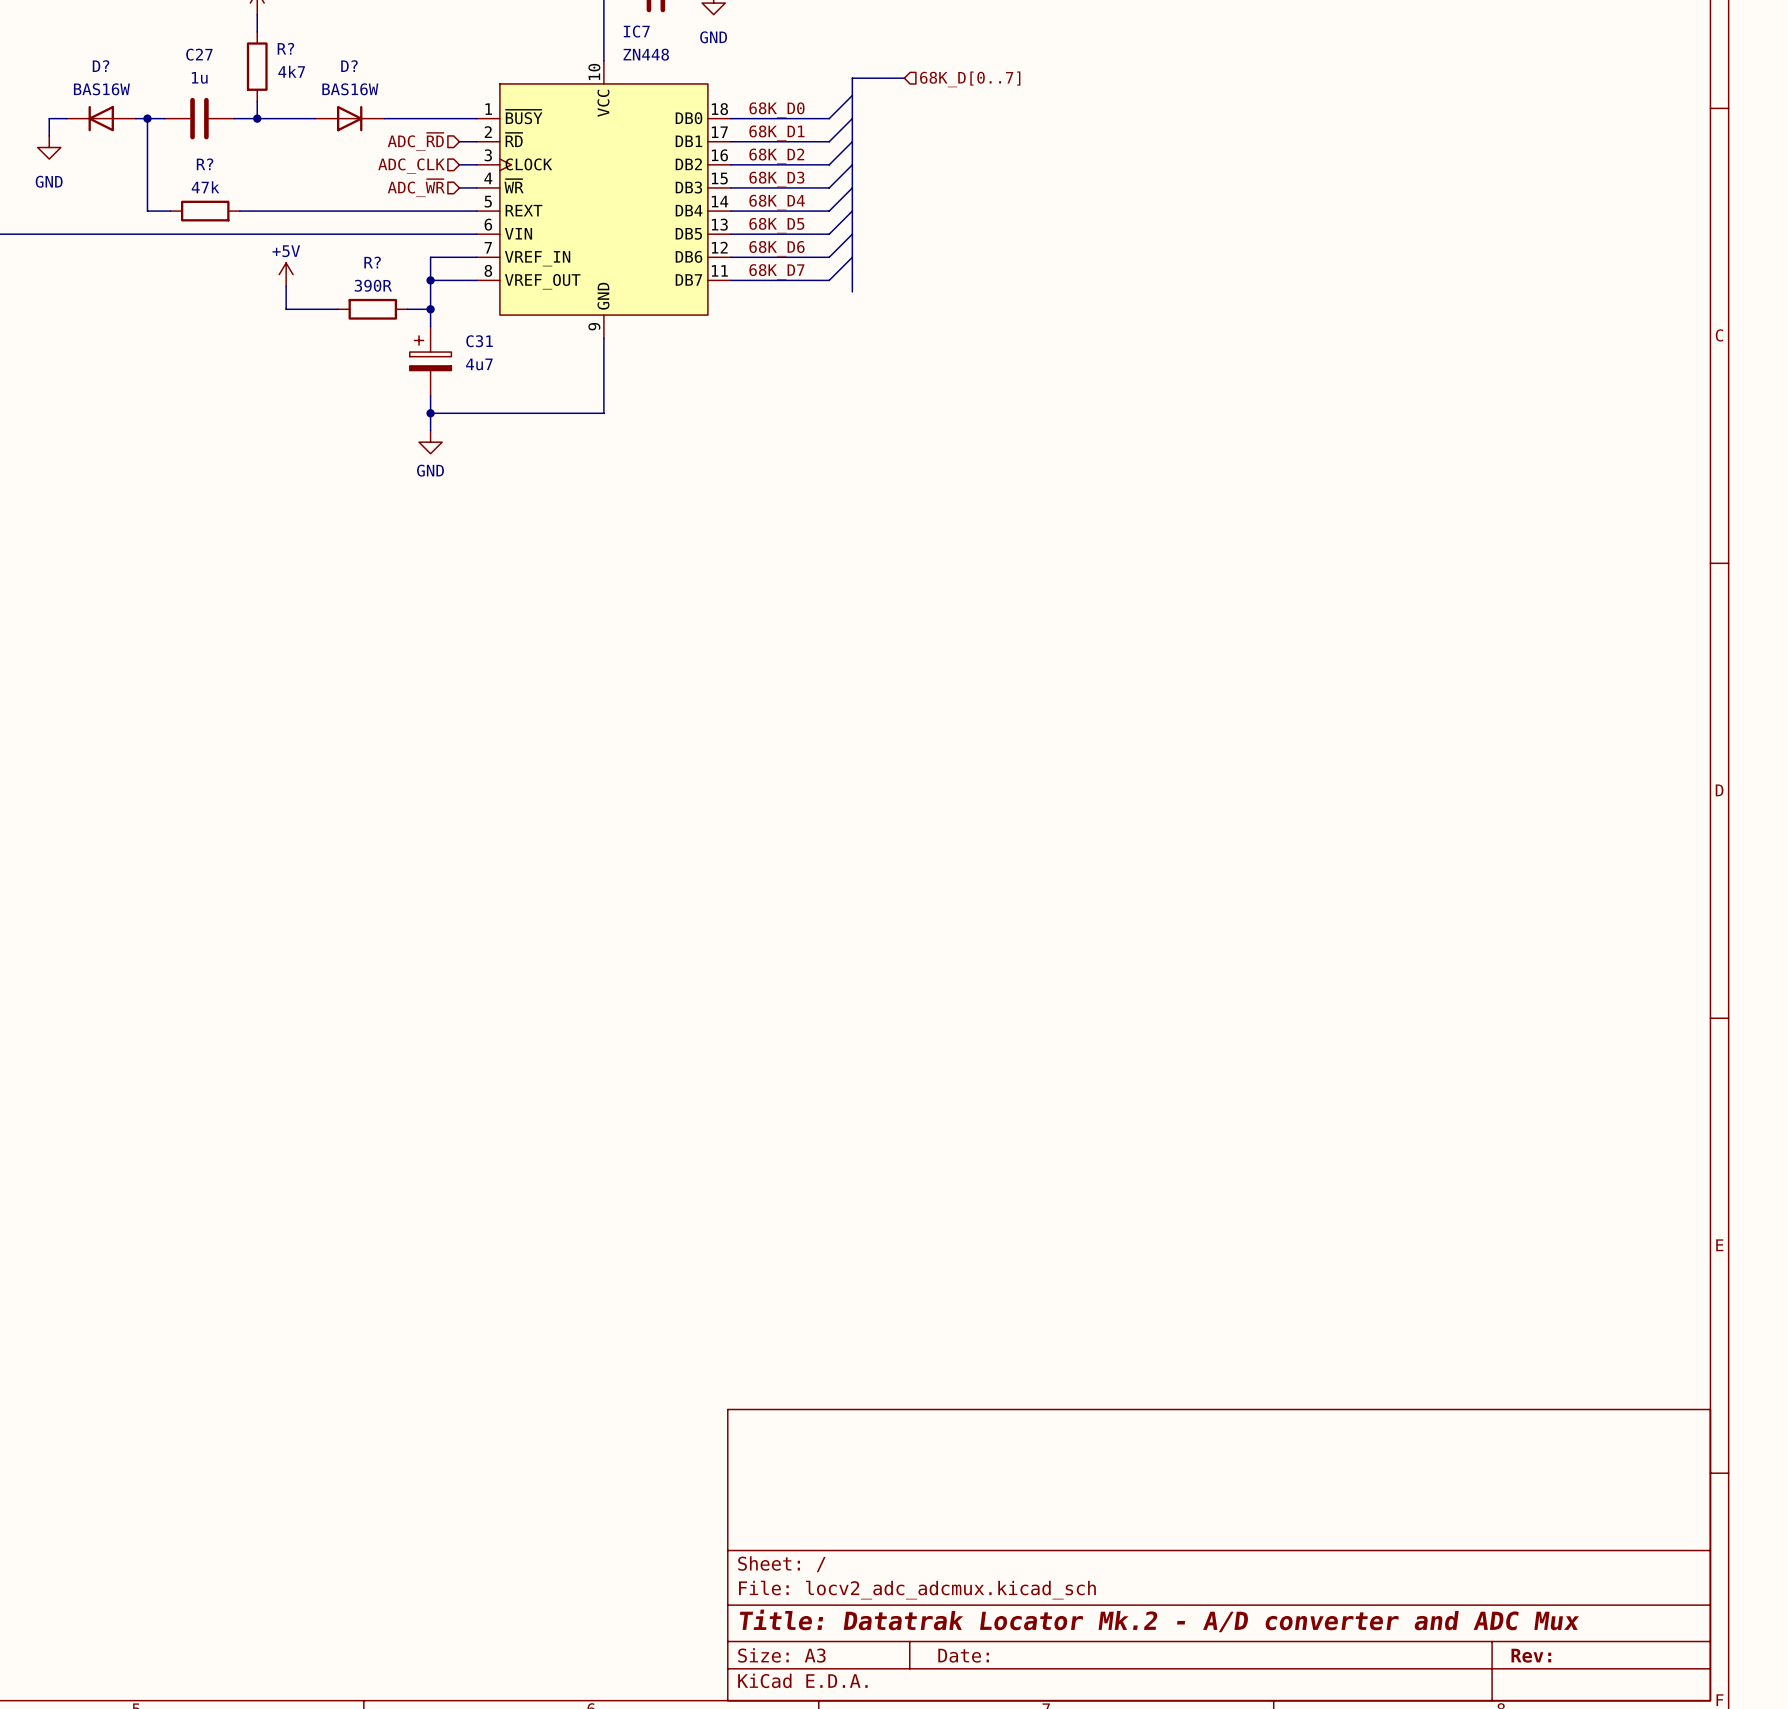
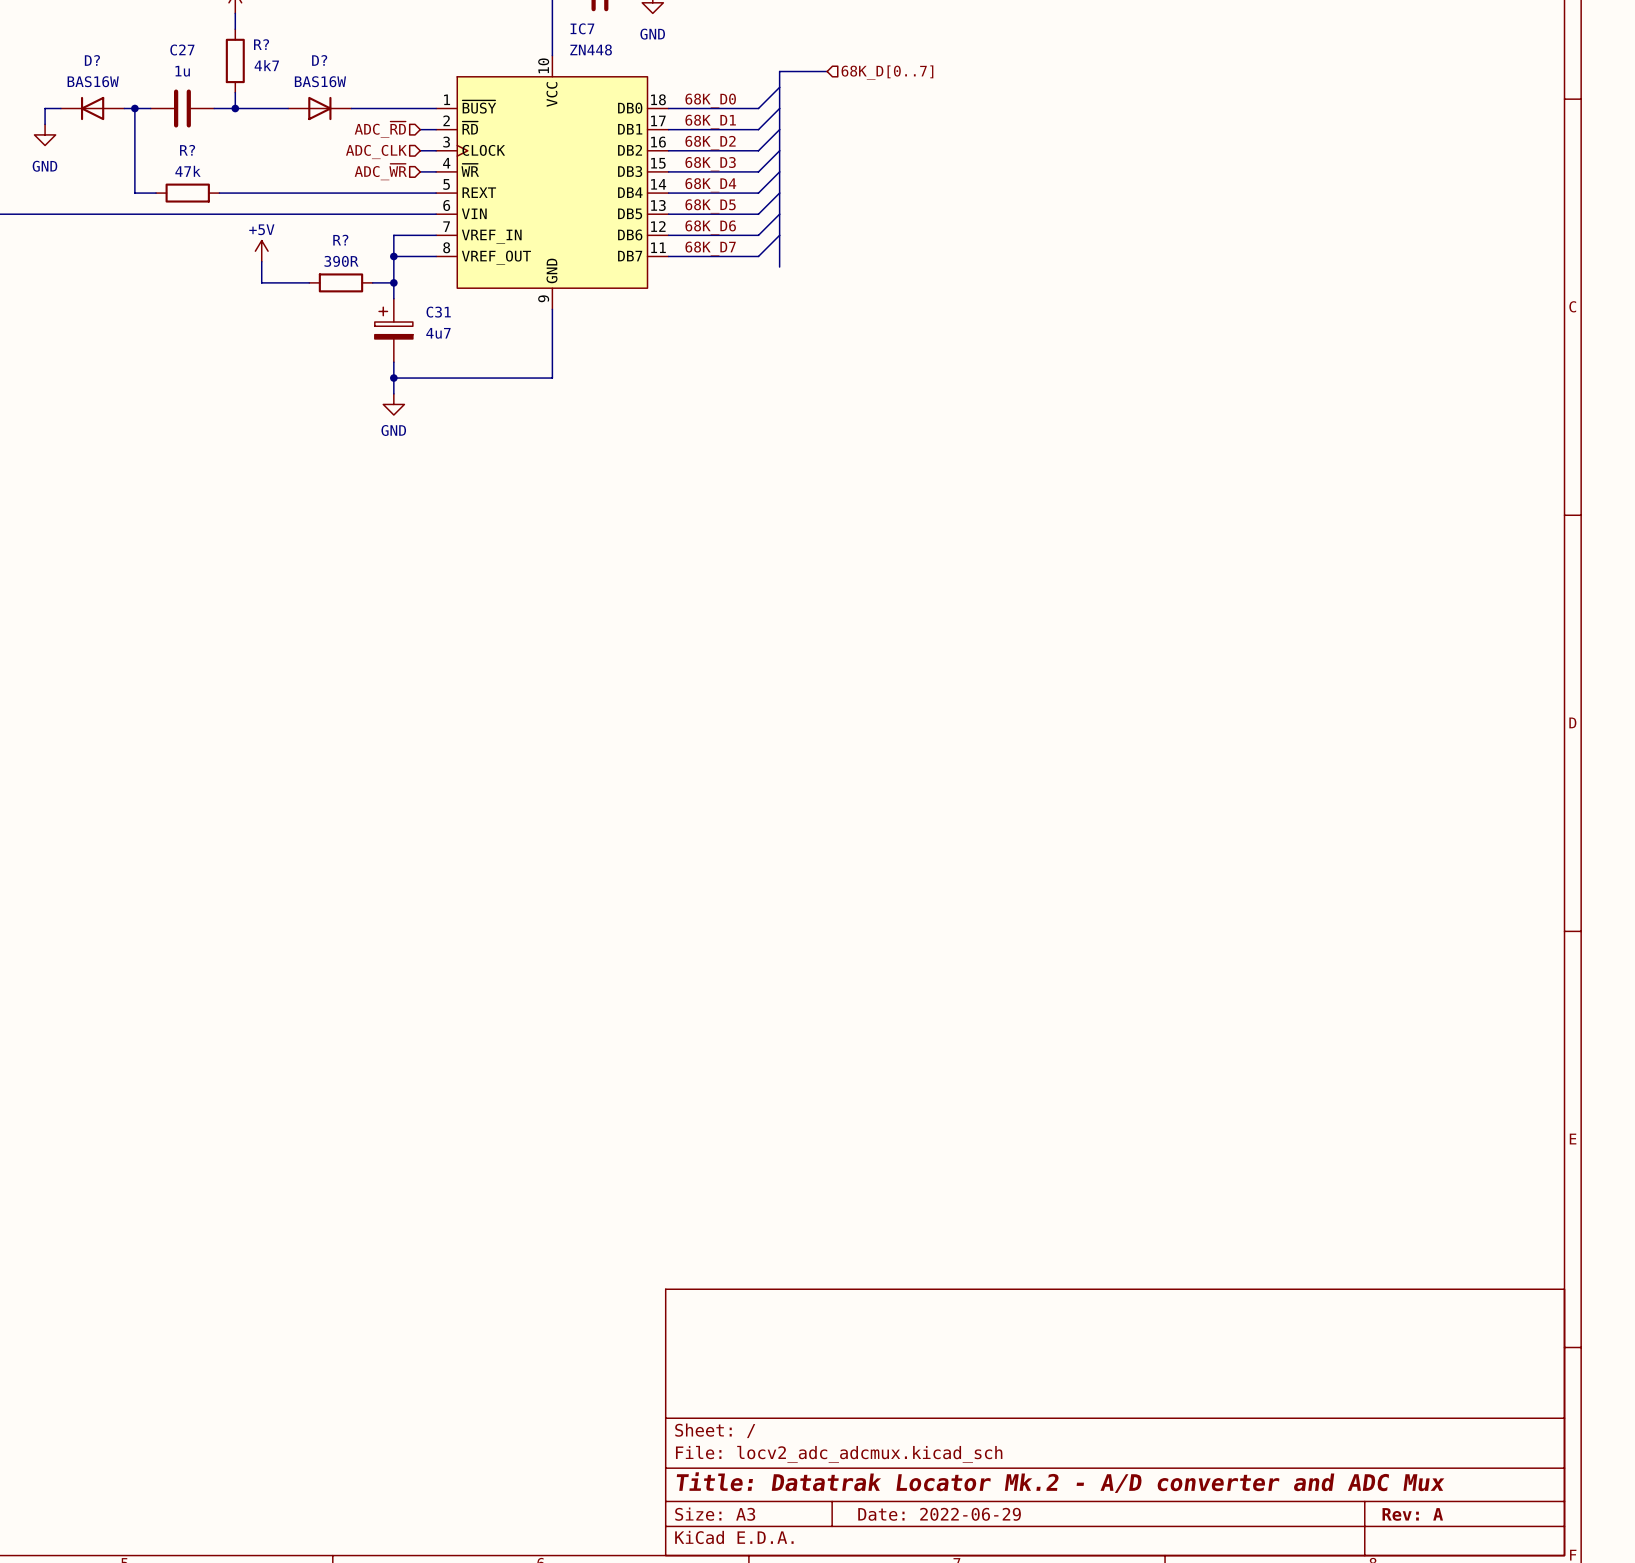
title block: Date: (963, 1655) -> Date: 2022-06-29 (939, 1514)
title block: Rev: (1531, 1655) -> Rev: A (1412, 1514)

